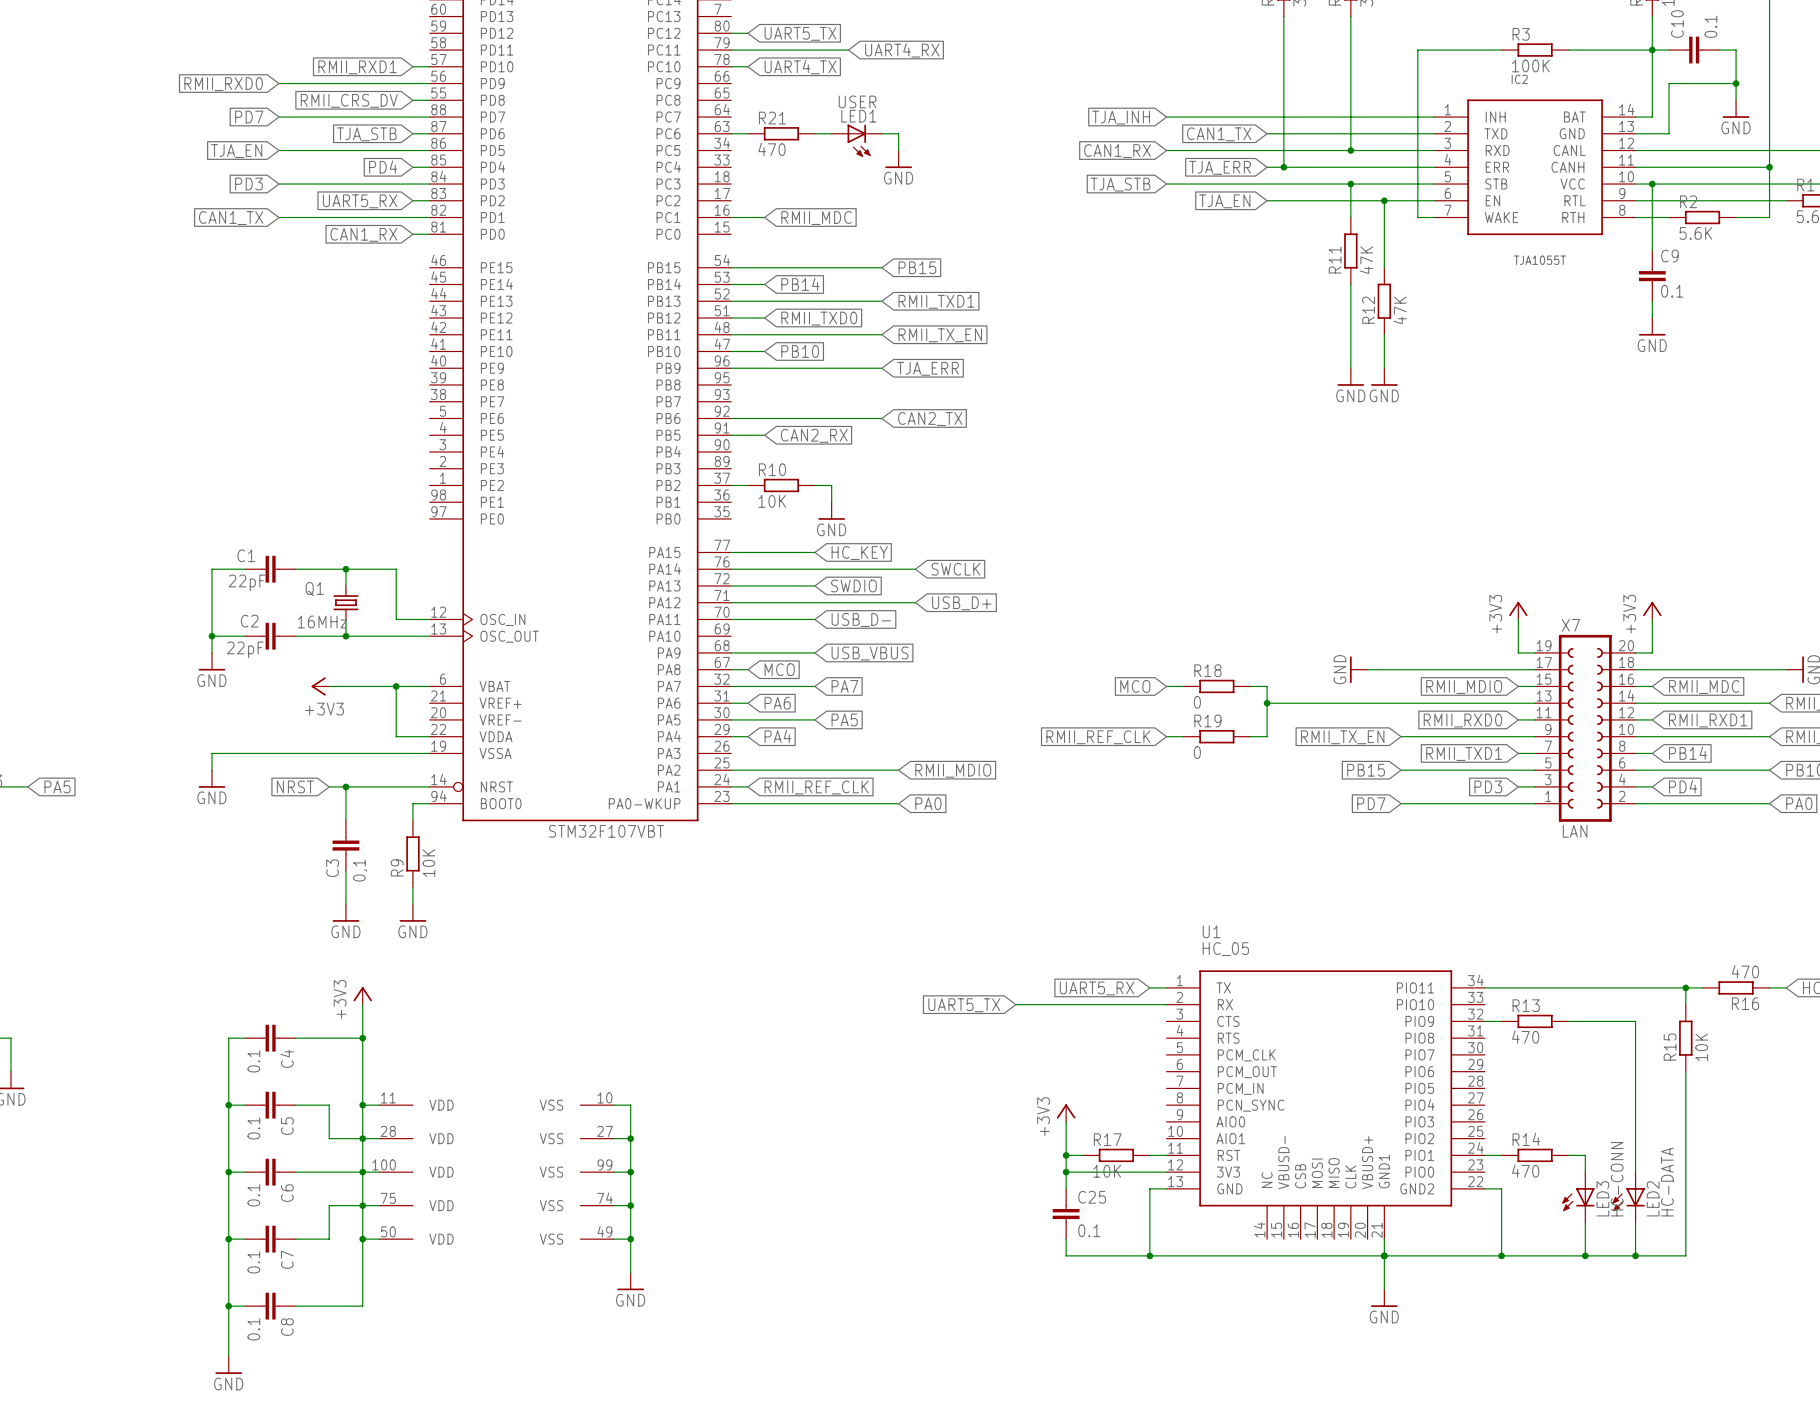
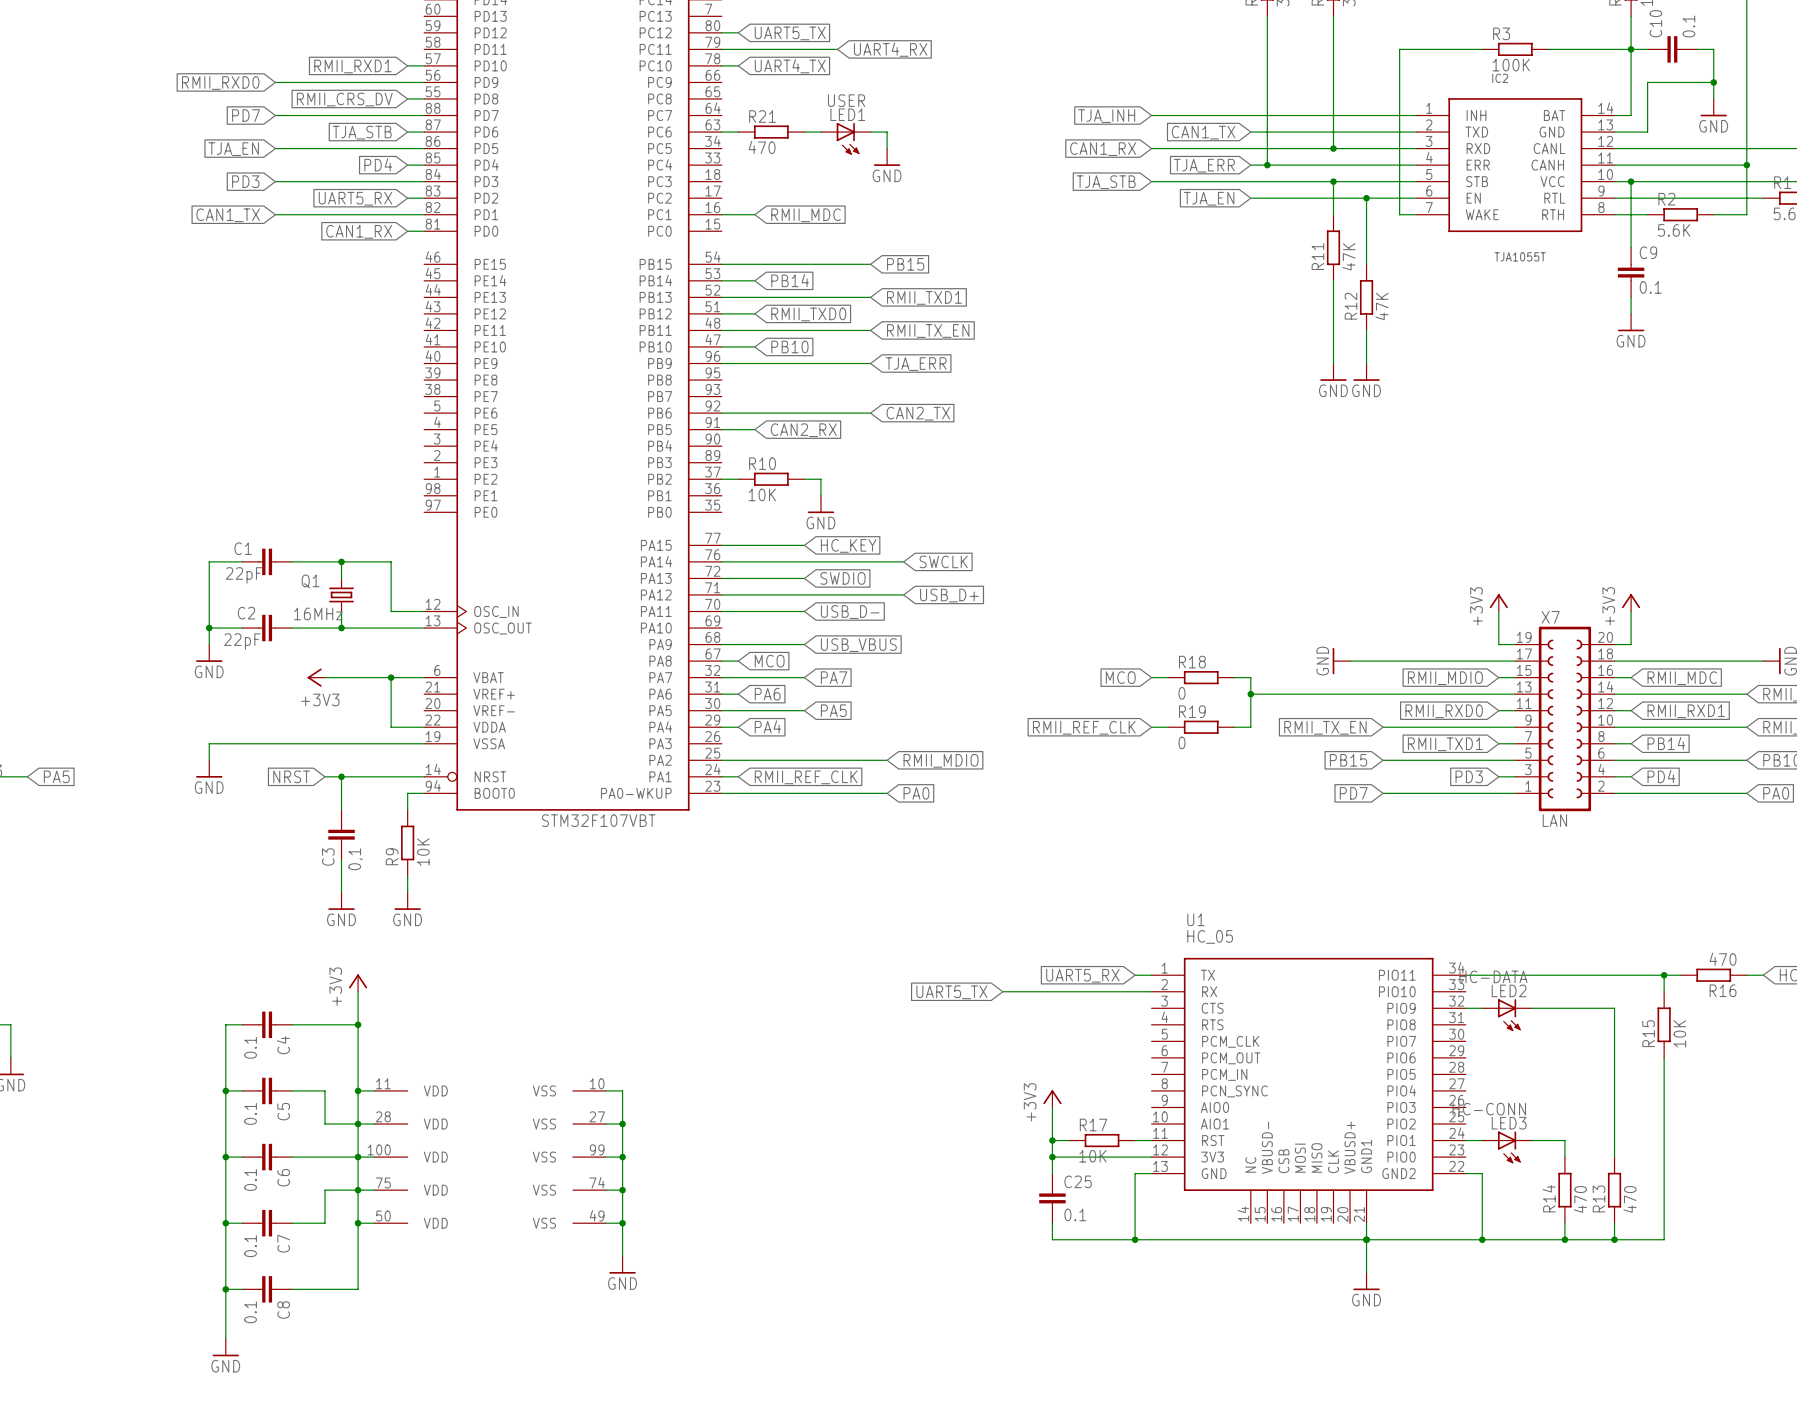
R13 name position: R13 (1526, 1005) -> R13 (1599, 1198)
R13 rotation: 0° (1535, 1021) -> 90° clockwise (1614, 1190)
R13 position: (1535, 1021) -> (1614, 1190)
R13 value position: 470 (1525, 1037) -> 470 (1629, 1199)
R14 name position: R14 (1526, 1139) -> R14 (1549, 1198)
R14 rotation: 0° (1535, 1155) -> 90° clockwise (1564, 1190)
R14 position: (1535, 1155) -> (1564, 1190)
R14 value position: 470 (1525, 1171) -> 470 (1580, 1199)
LED3 position: (1578, 1197) -> (1507, 1147)
LED2 position: (1628, 1197) -> (1507, 1015)
LED3 rotation: 0° (1578, 1199) -> 90° counterclockwise (1509, 1147)
LED2 rotation: 0° (1628, 1199) -> 90° counterclockwise (1509, 1015)

